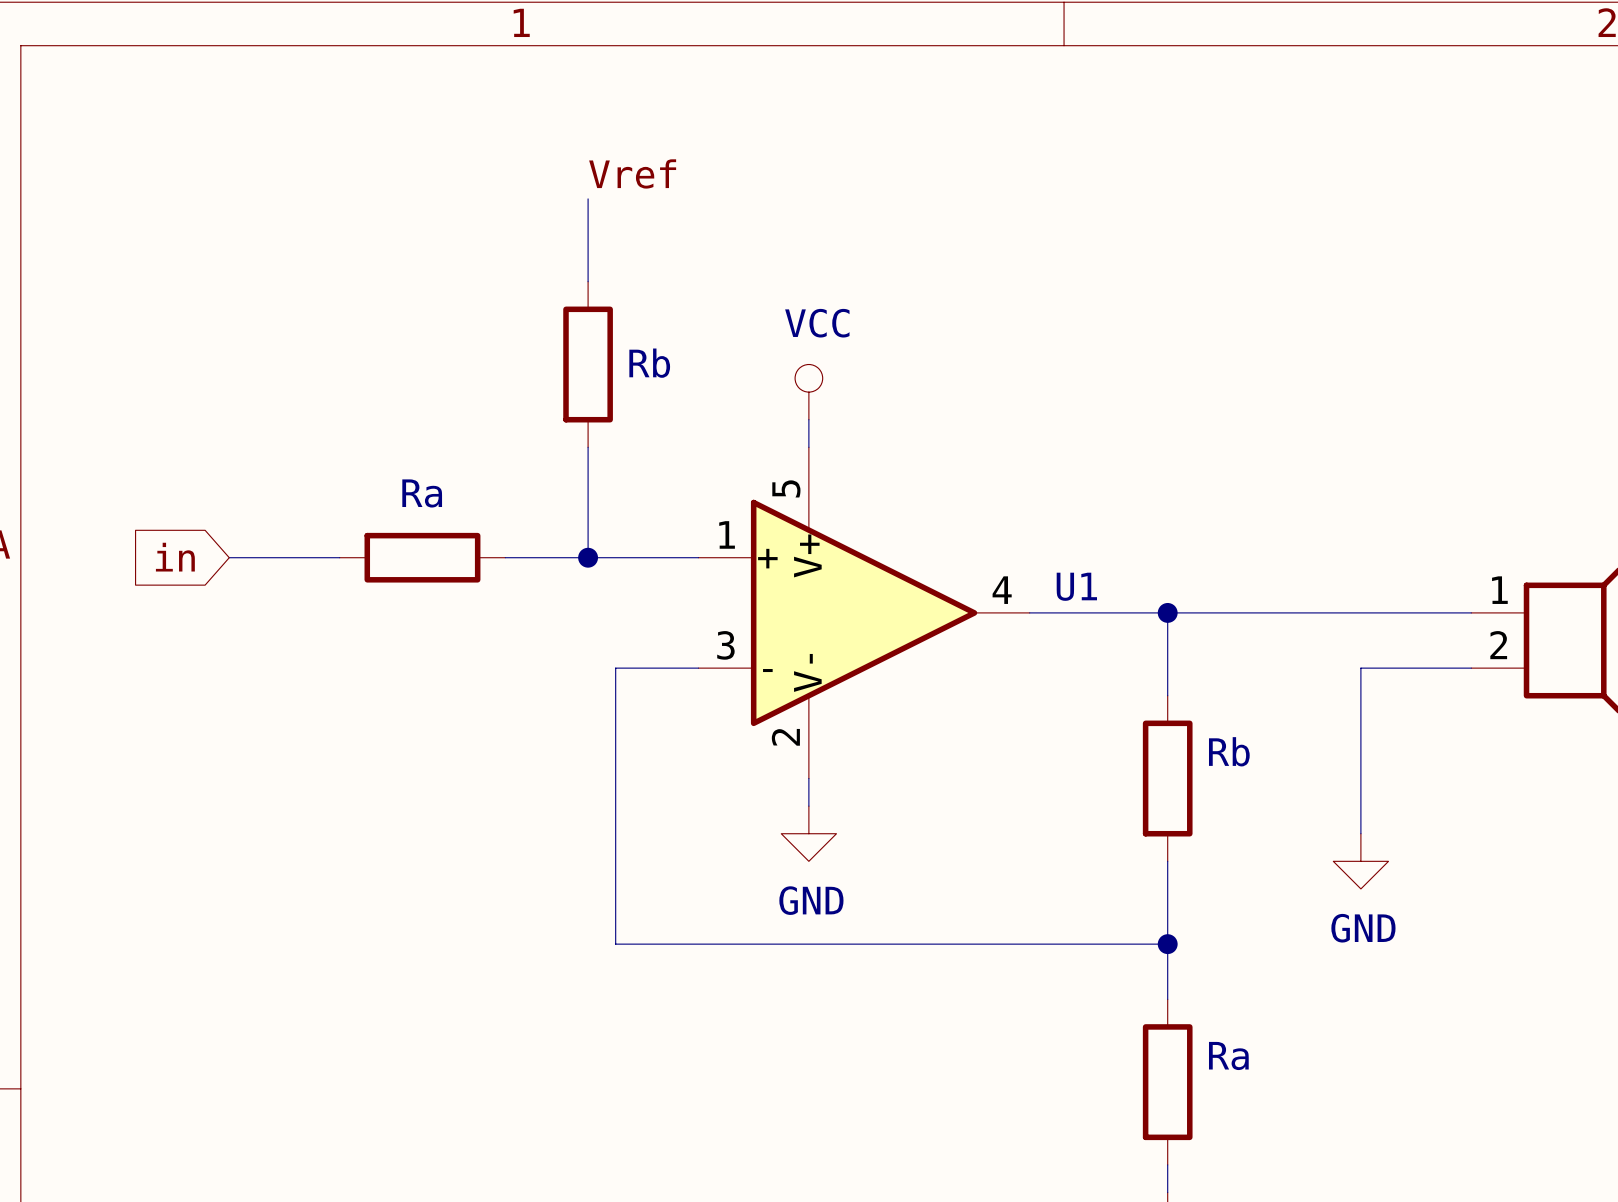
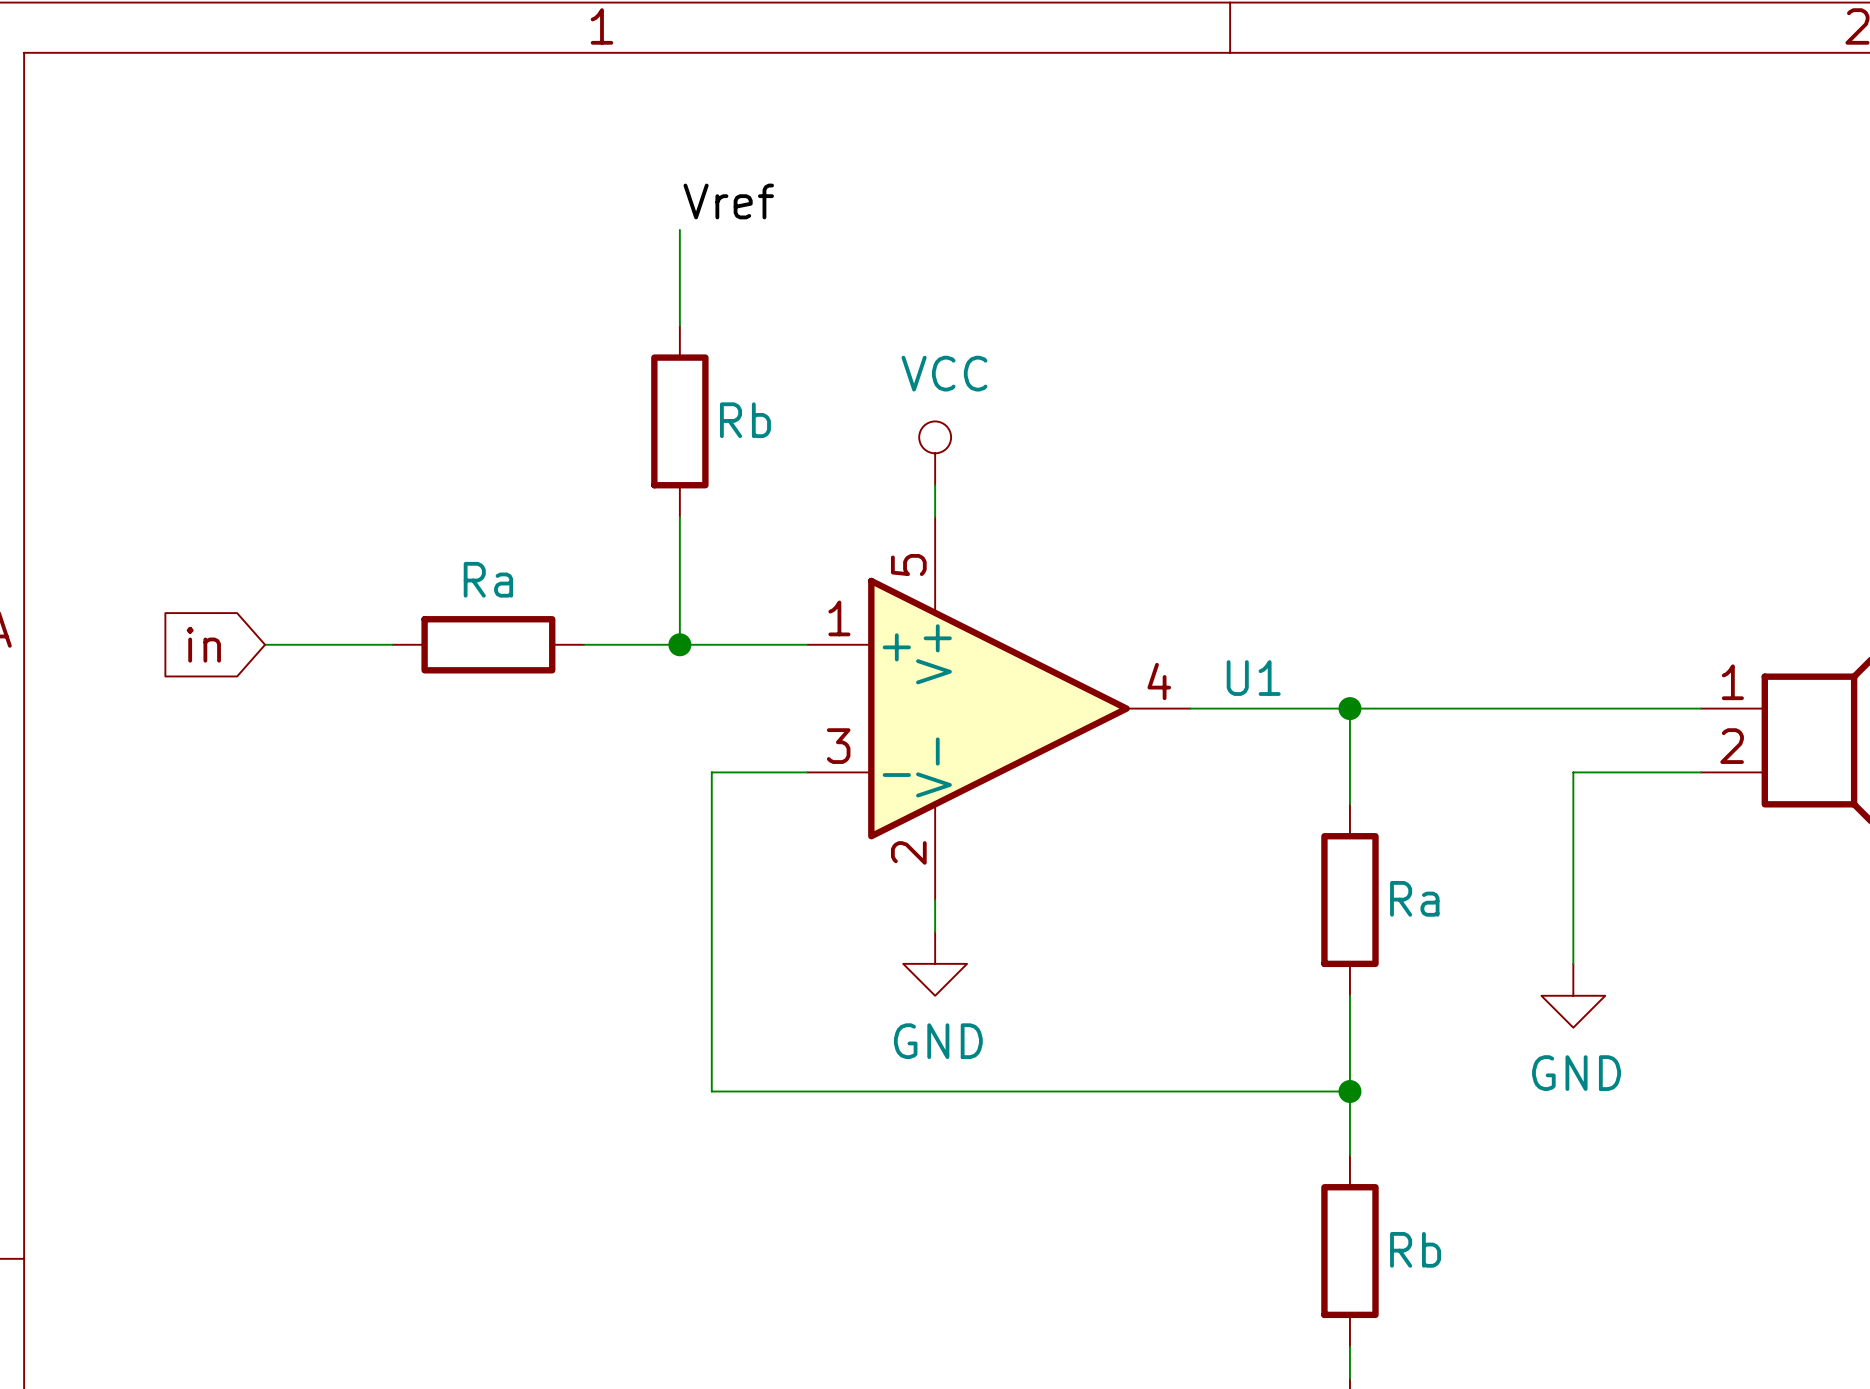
Rb value: none -> Rb (745, 420)
Rb name: Rb (649, 363) -> none
Ra name: Ra (422, 493) -> none
Ra value: none -> Ra (488, 579)
Rb name: Rb (1229, 751) -> none
Rb value: none -> Ra (1414, 898)
Ra name: Ra (1228, 1055) -> none
Ra value: none -> Rb (1415, 1249)

